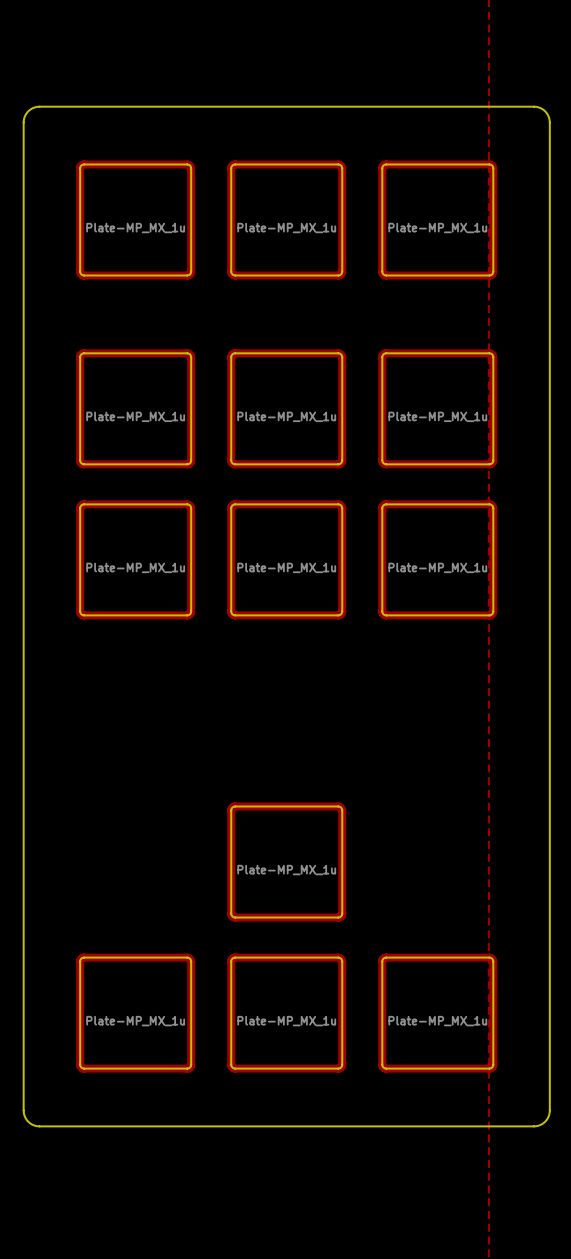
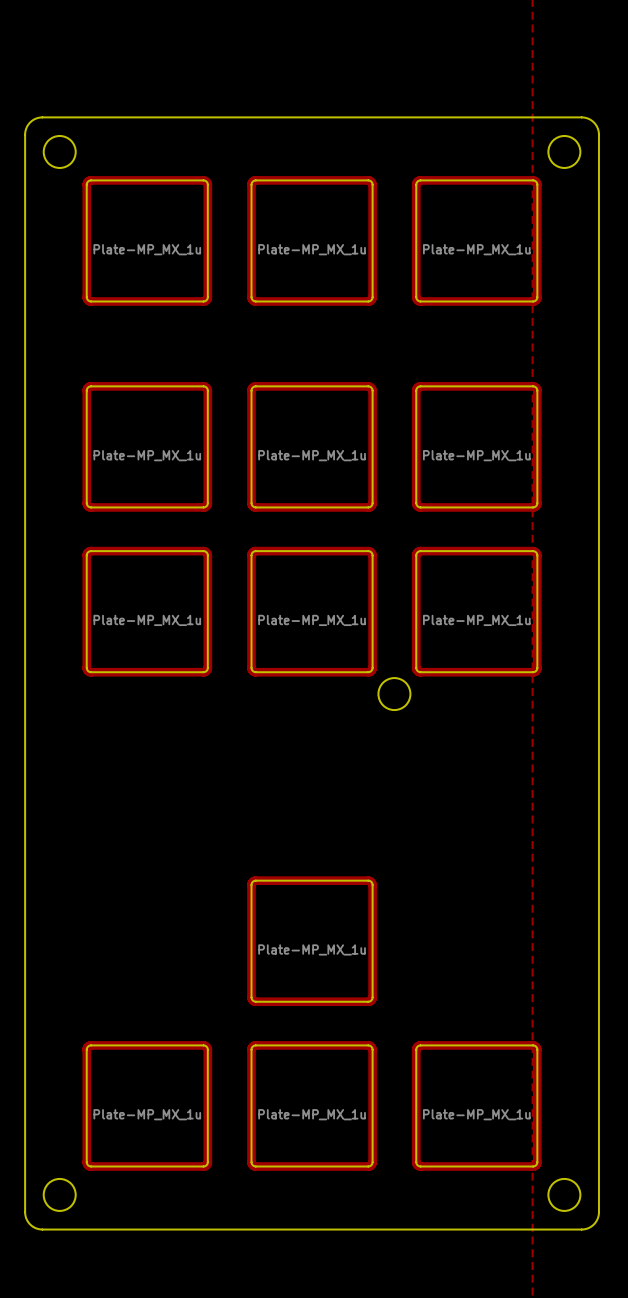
round board edge: none -> [43, 135, 77, 169]
round board edge: none -> [547, 135, 582, 169]
round board edge: none -> [377, 677, 412, 711]
round board edge: none -> [43, 1178, 77, 1212]
round board edge: none -> [547, 1178, 582, 1212]

